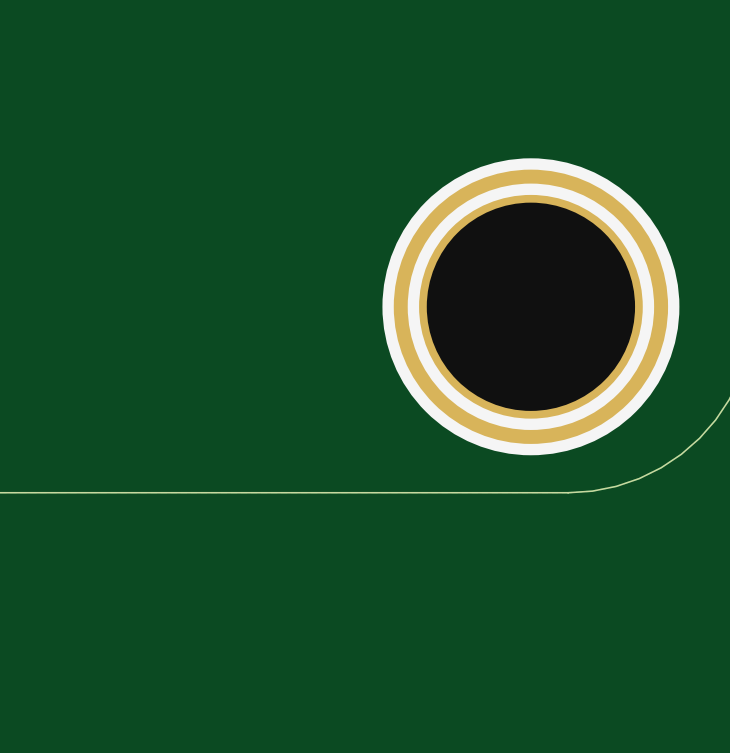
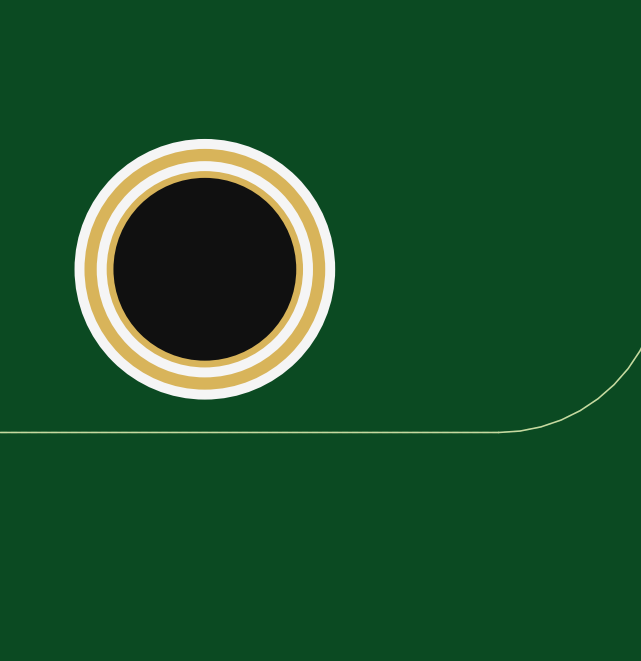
part position: (530, 306) -> (204, 269)

